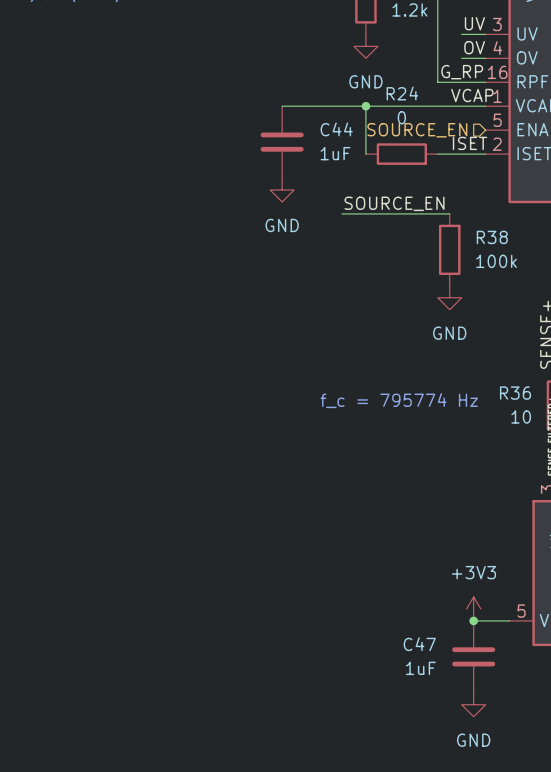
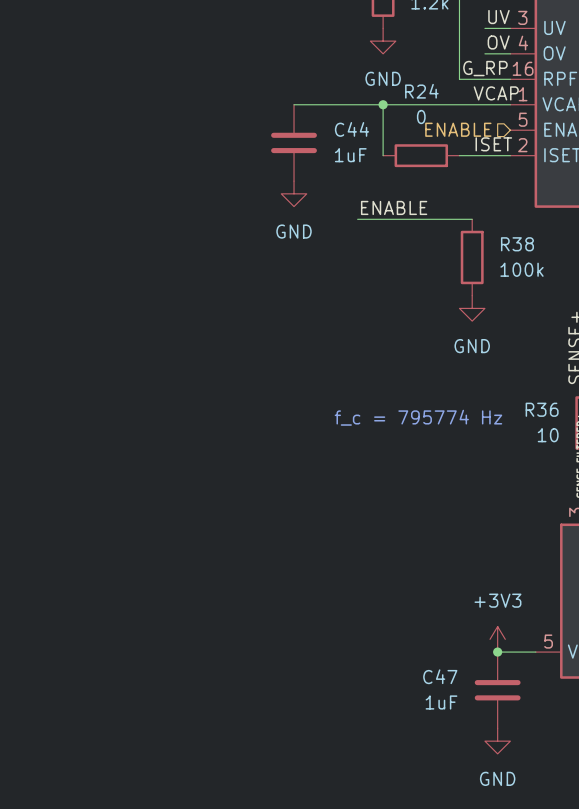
hierarchical label: SOURCE_EN (417, 130) -> ENABLE (458, 129)
label: SOURCE_EN (394, 203) -> ENABLE (394, 207)

